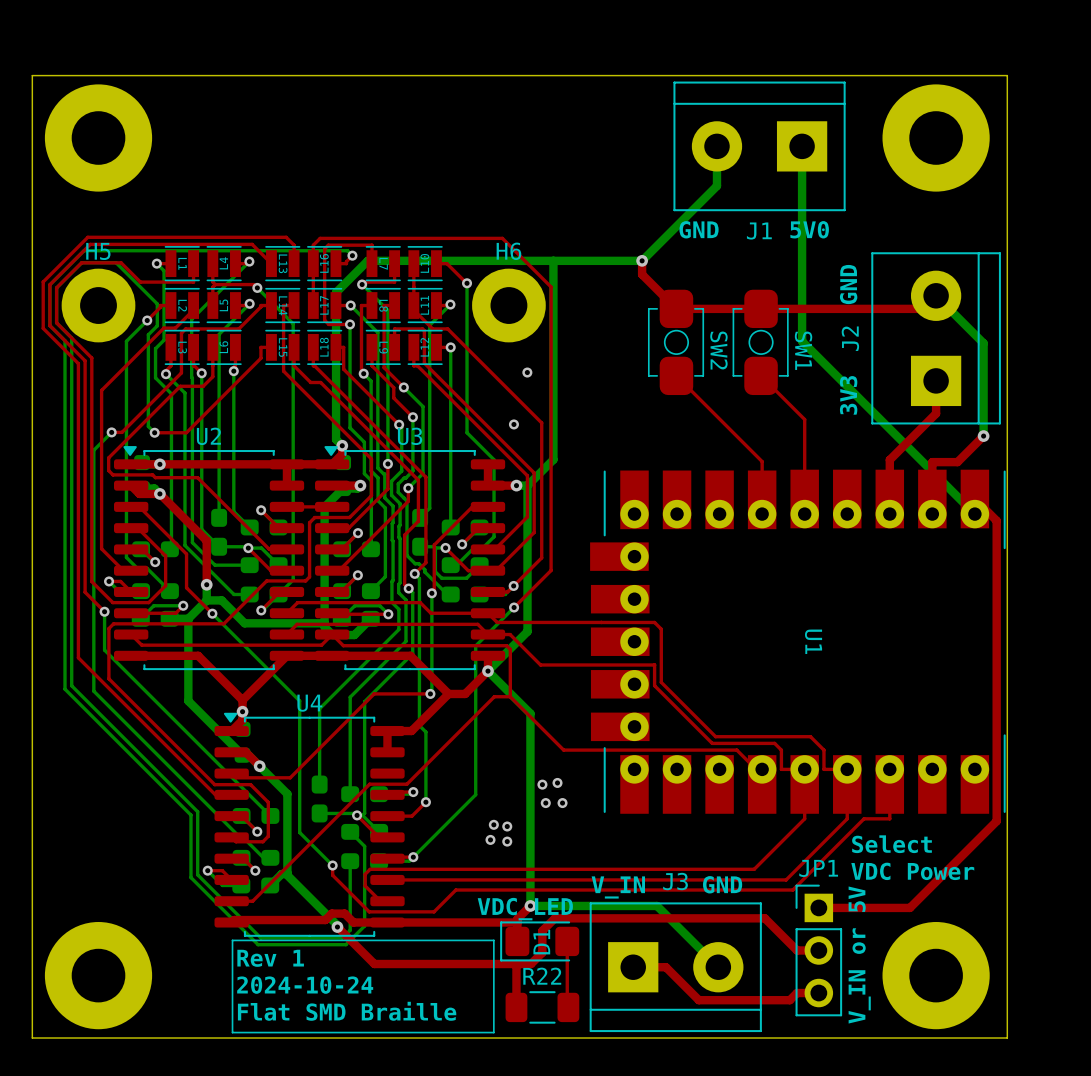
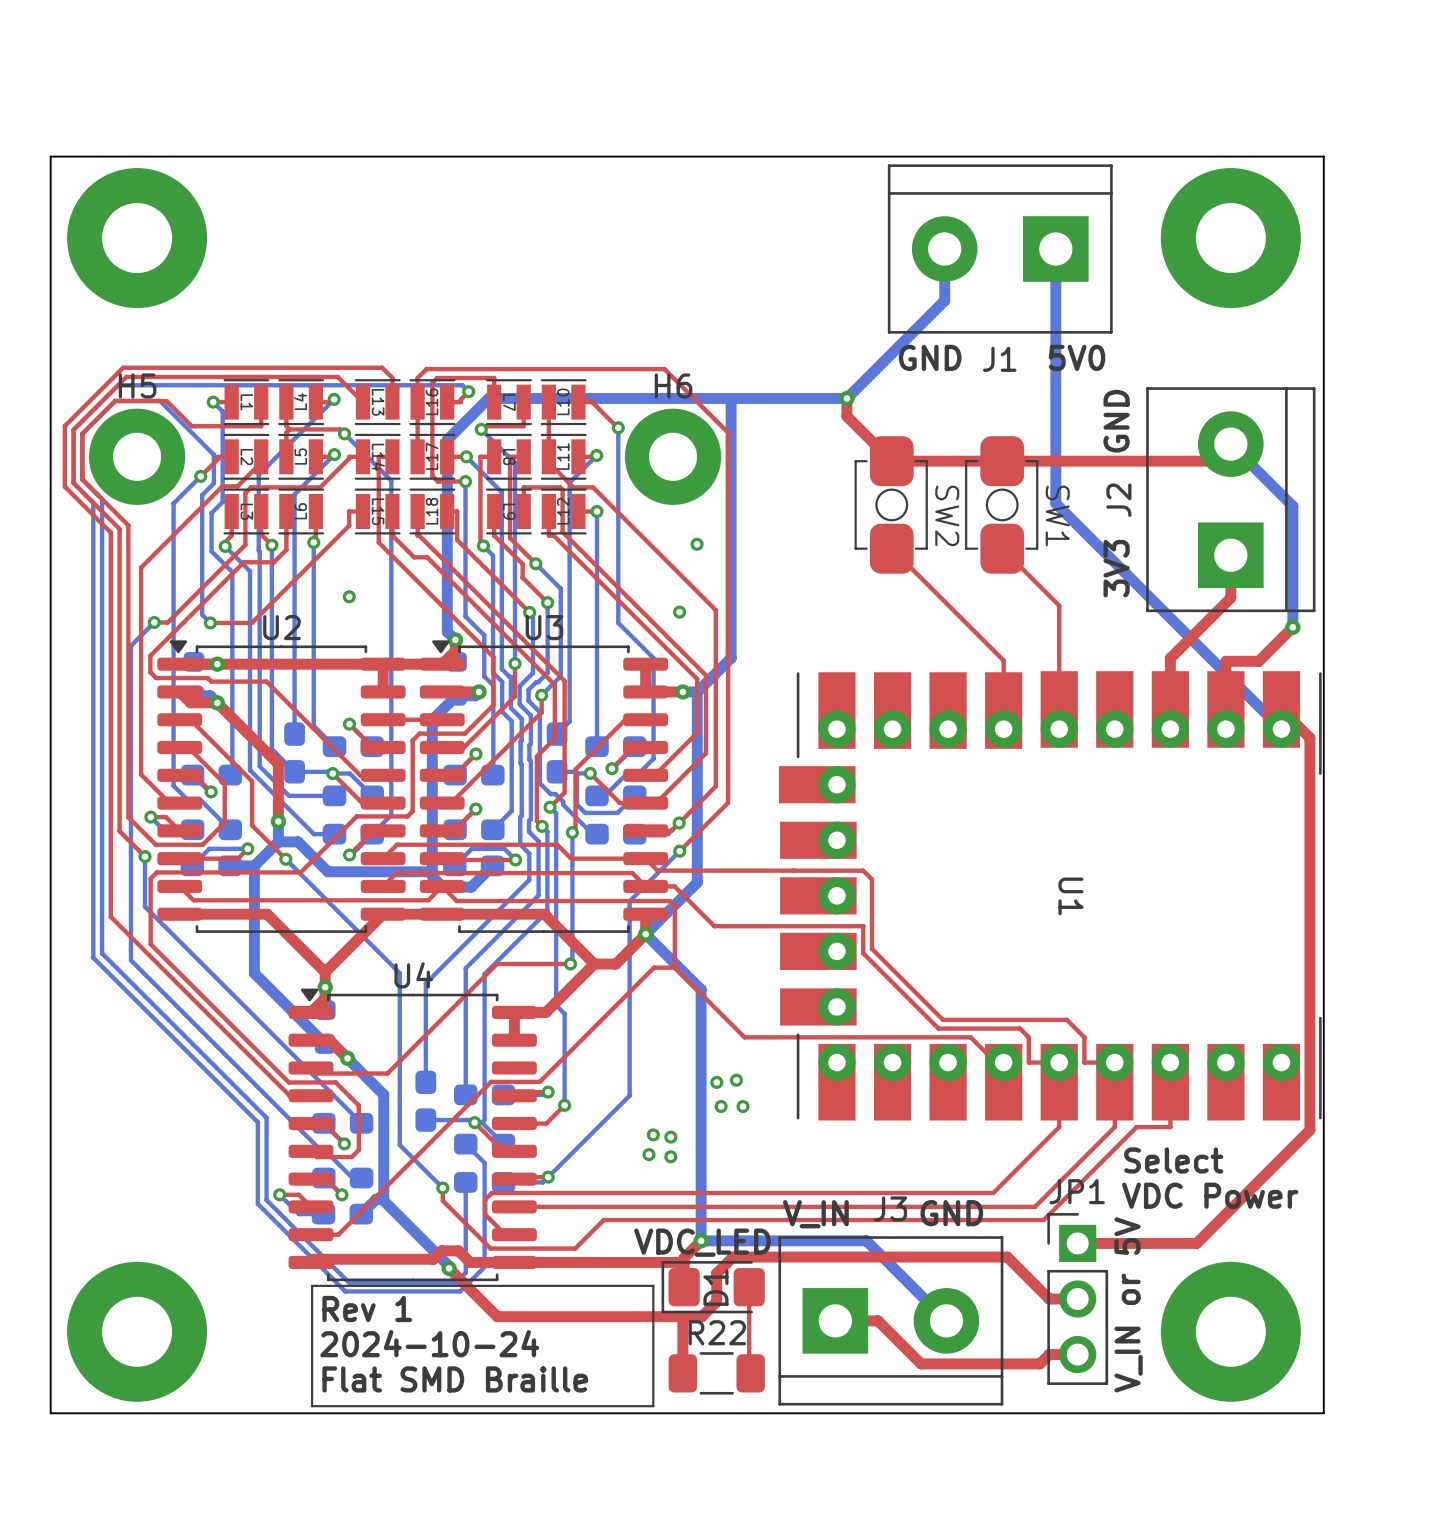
via: none -> (349, 596)

